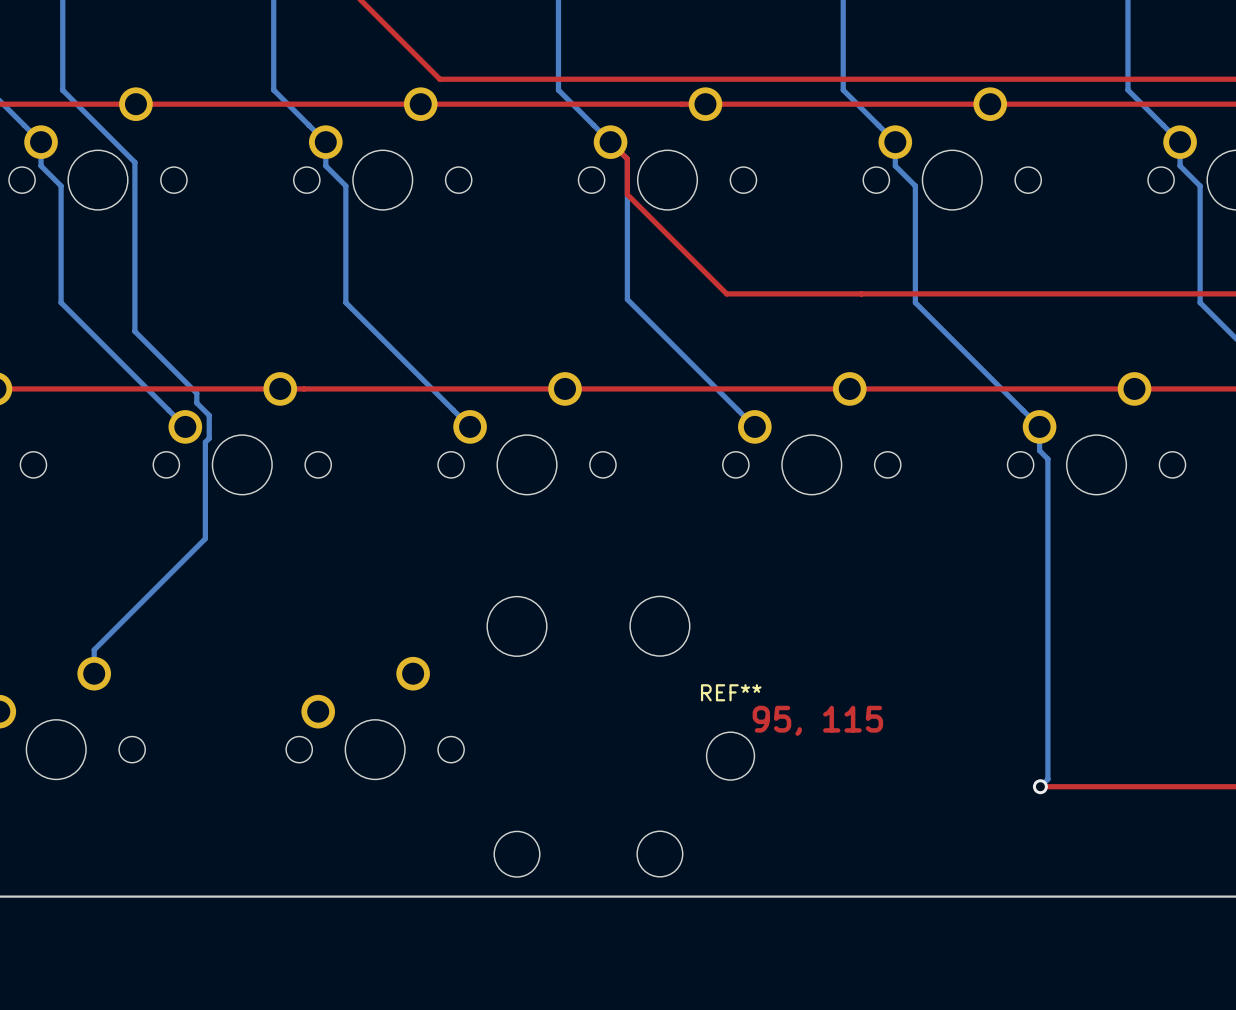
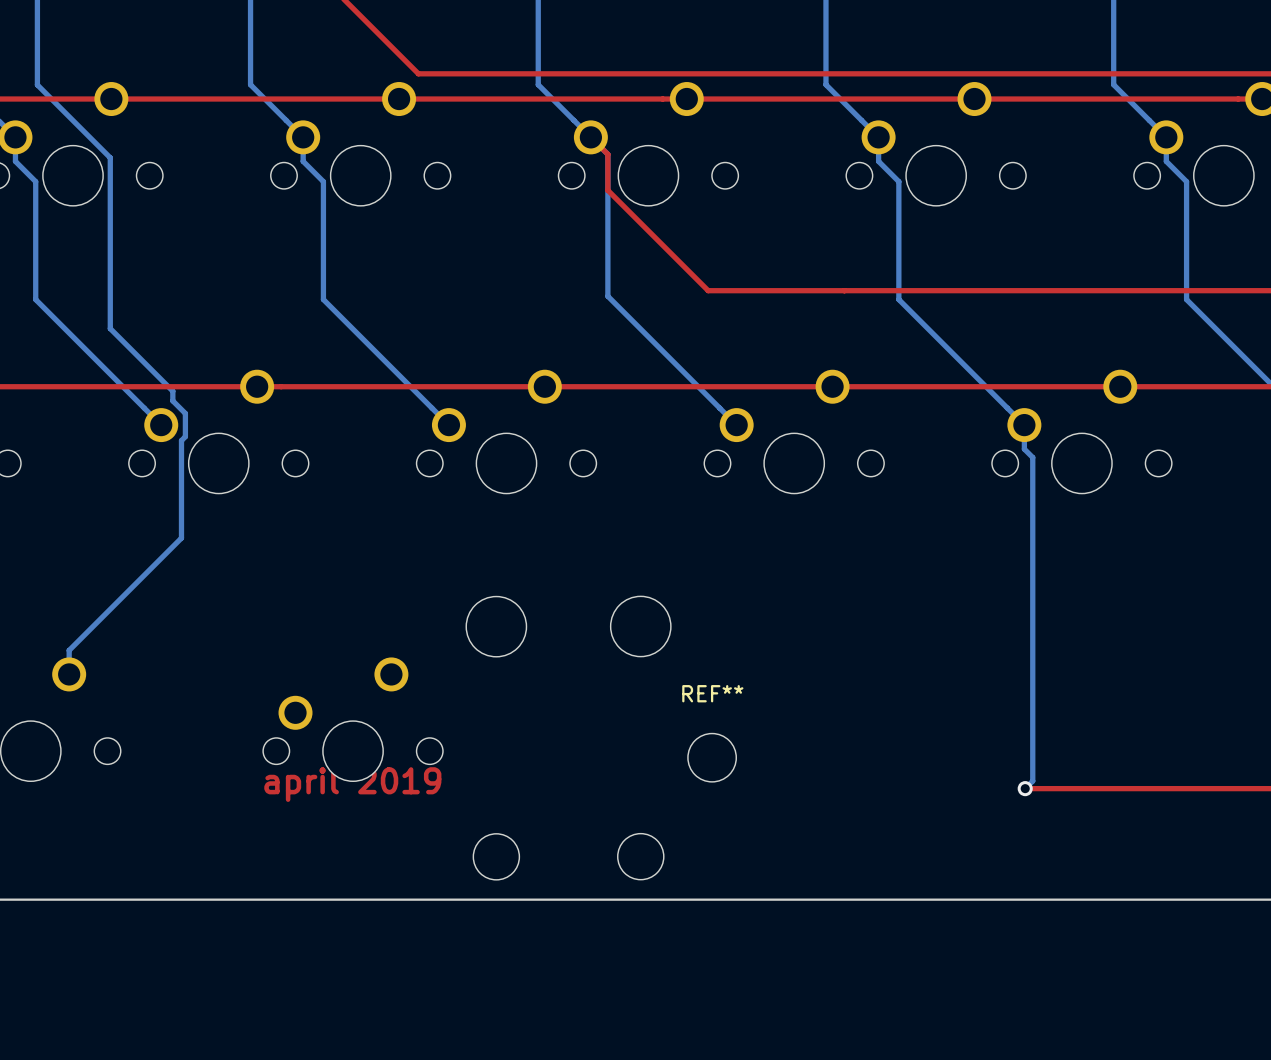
text: 95, 115 (817, 720) -> none
text: none -> april 2019 (352, 784)

